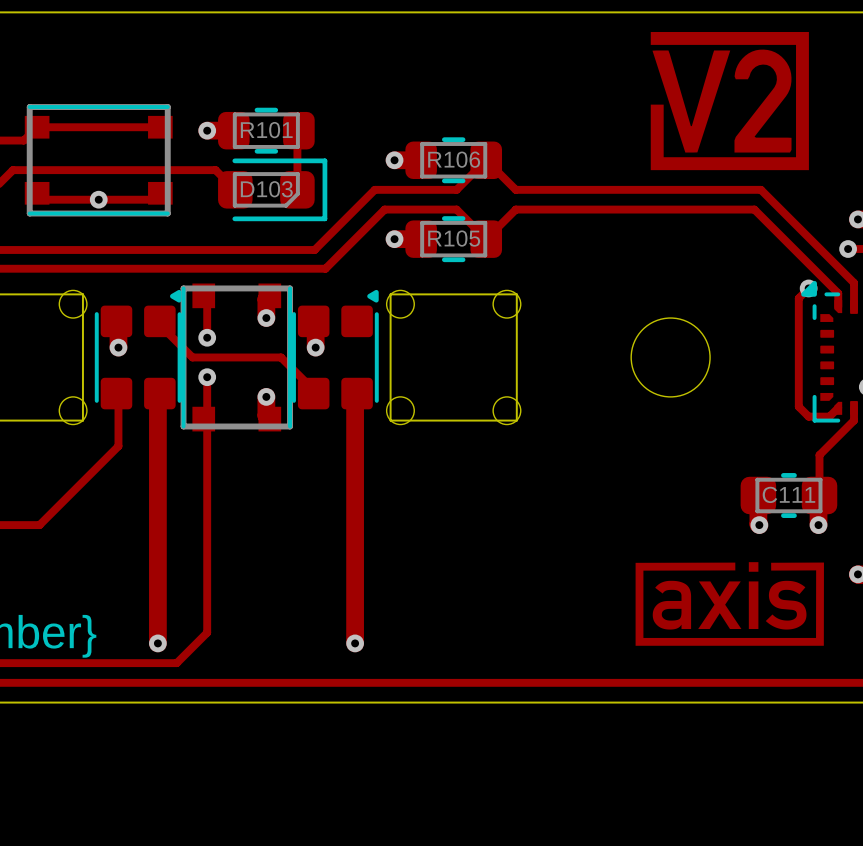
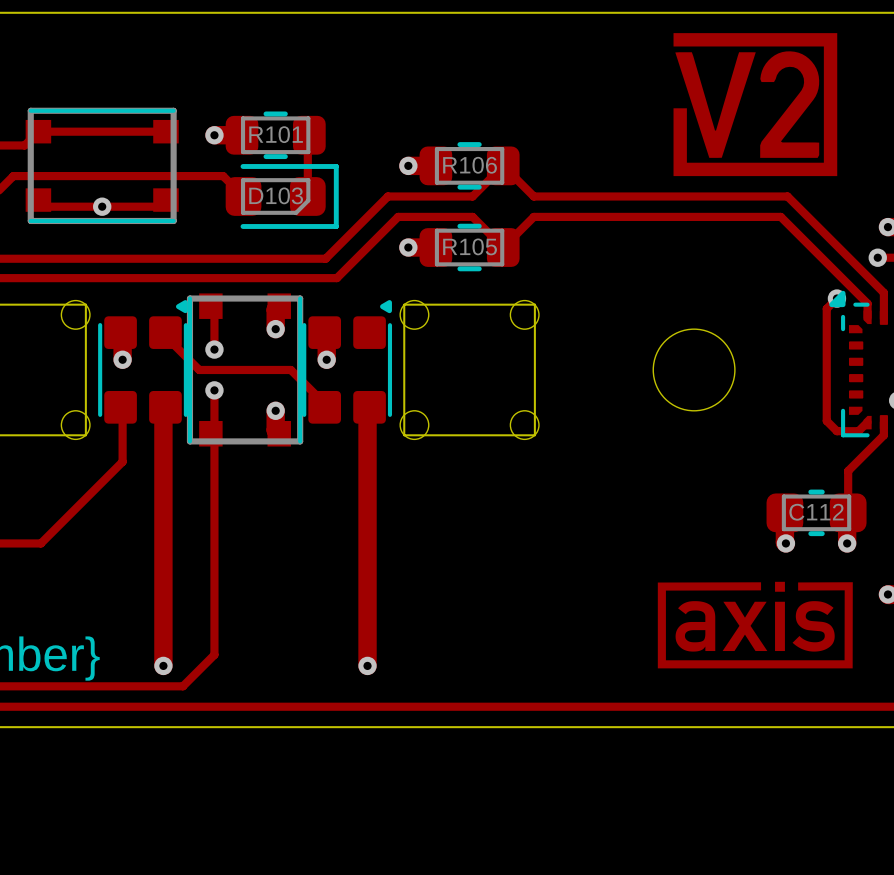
C111 name: C111 (788, 494) -> C112 (816, 512)

